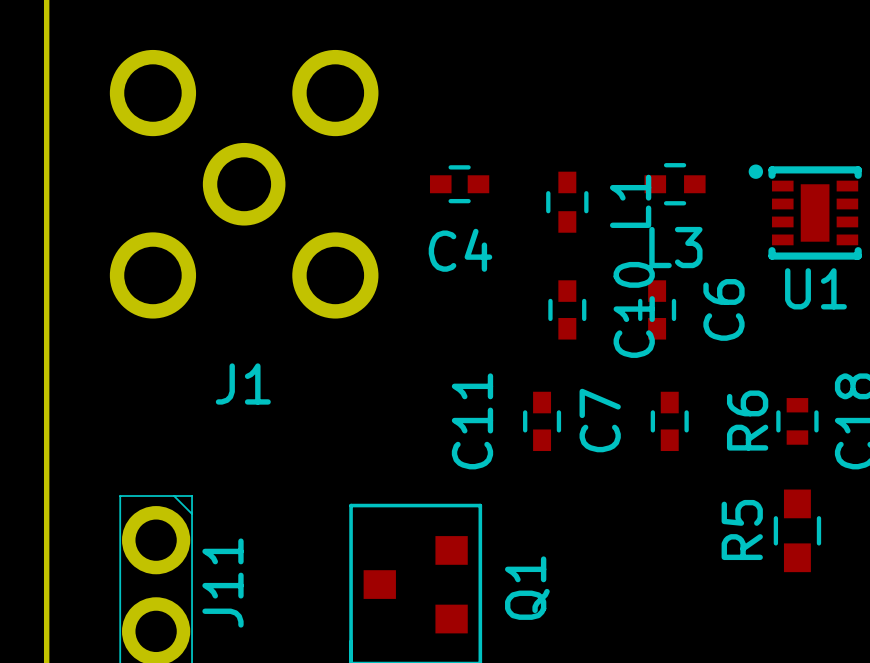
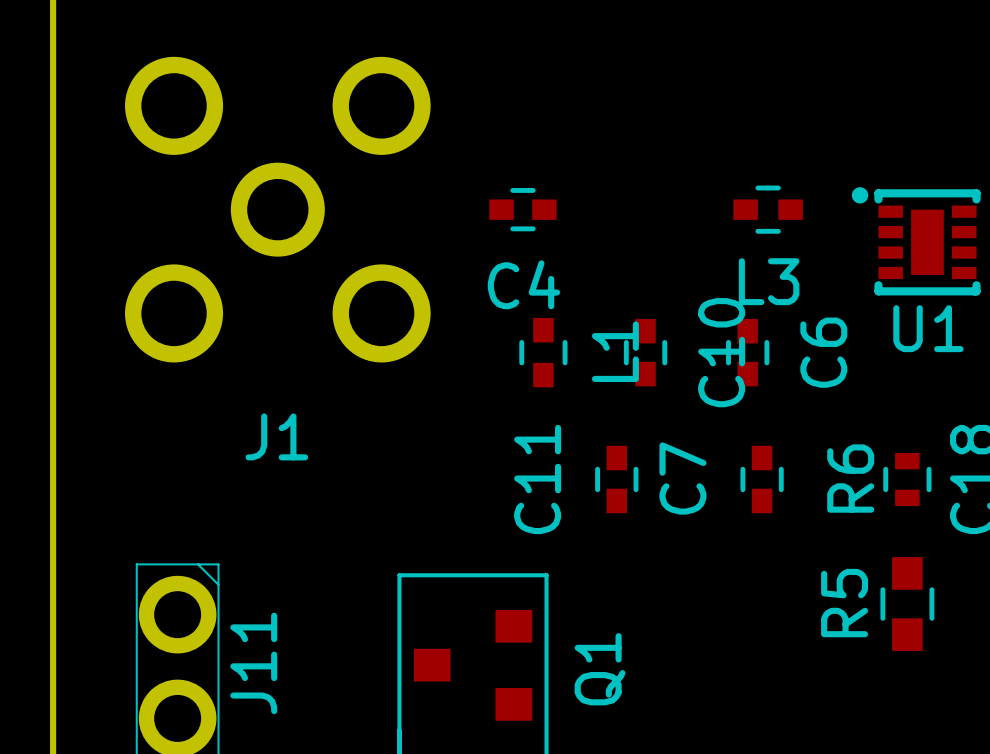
L1 position: (567, 202) -> (543, 352)

